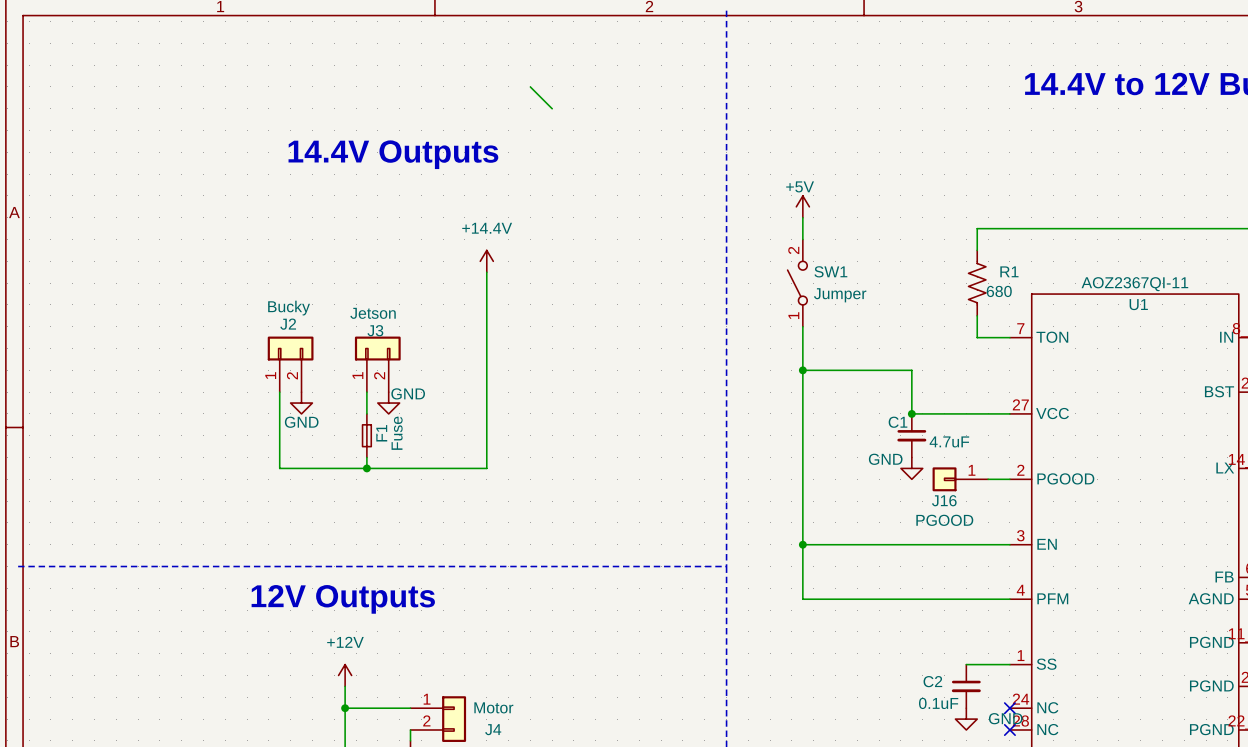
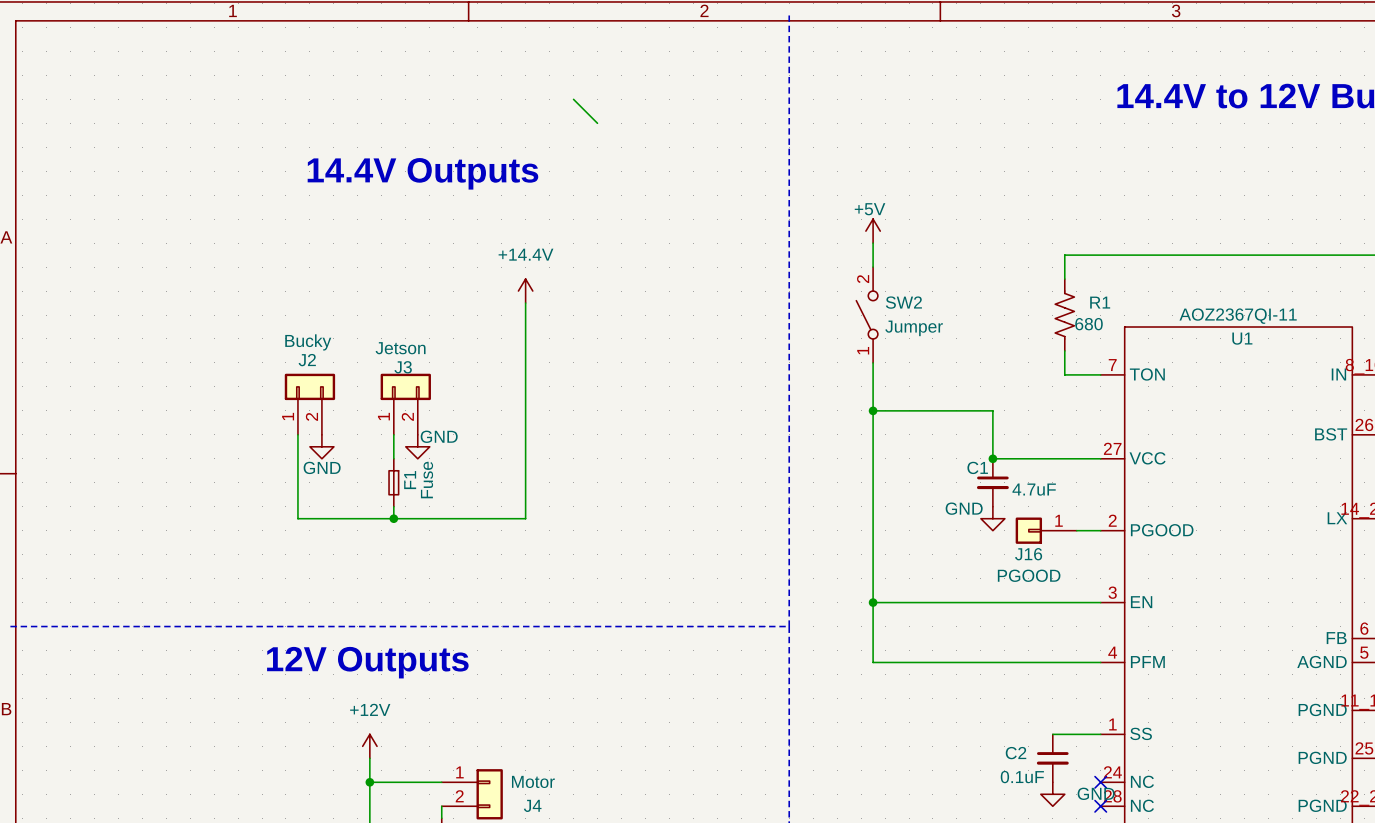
SW1 name: SW1 (830, 271) -> SW2 (903, 302)

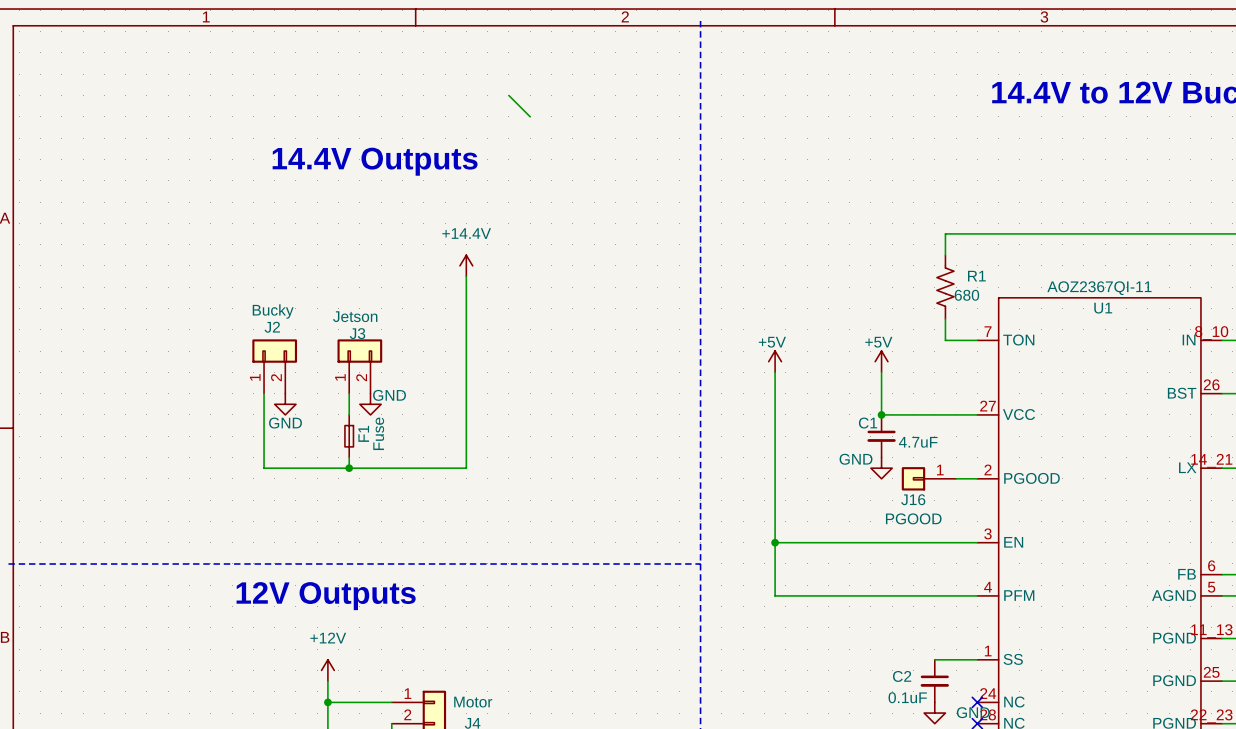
power symbol: +5V (873, 231) -> none
wire: (873, 243) (873, 267) -> none
SW2: Jumper (867, 315) -> none
wire: (873, 362) (873, 410) (992, 410) -> none
power symbol: none -> +5V (775, 361)
power symbol: none -> +5V (881, 361)
junction: (873, 410) -> none

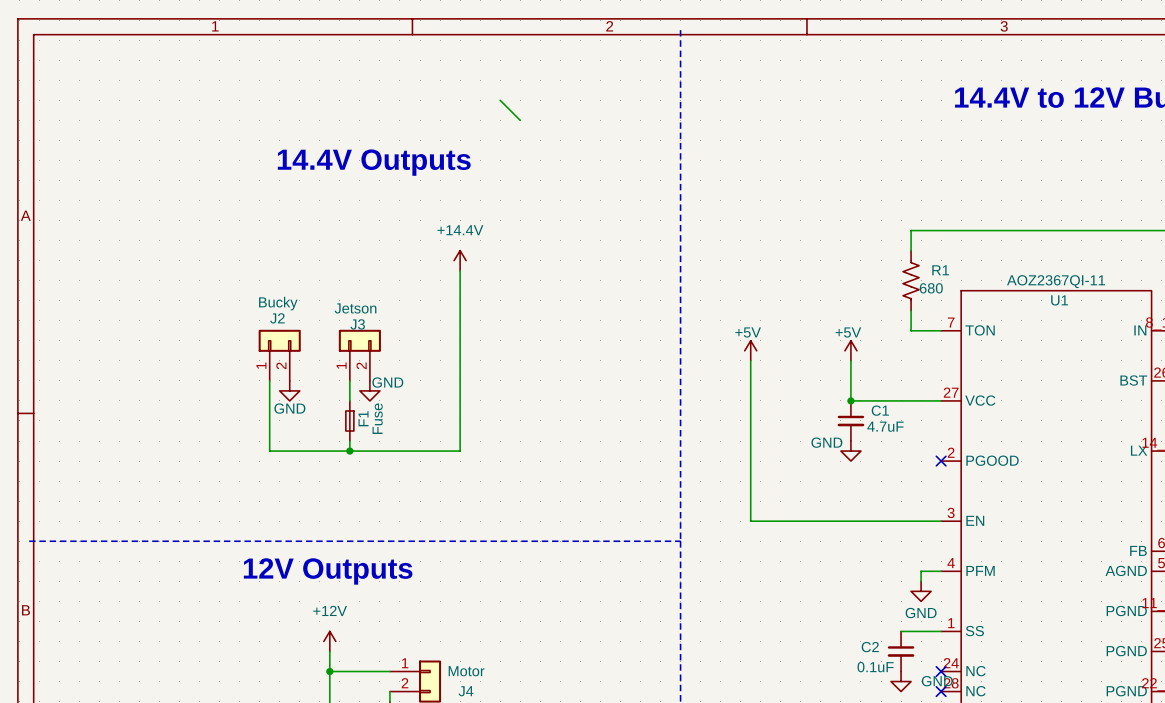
C1 name position: C1 (868, 423) -> C1 (880, 410)
J16: PGOOD (928, 478) -> none
wire: (956, 478) (977, 478) -> none
no-connect mark: none -> (941, 461)
wire: (775, 542) (775, 595) (956, 595) -> (921, 581) (921, 571)
junction: (775, 542) -> none
power symbol: none -> GND (921, 591)

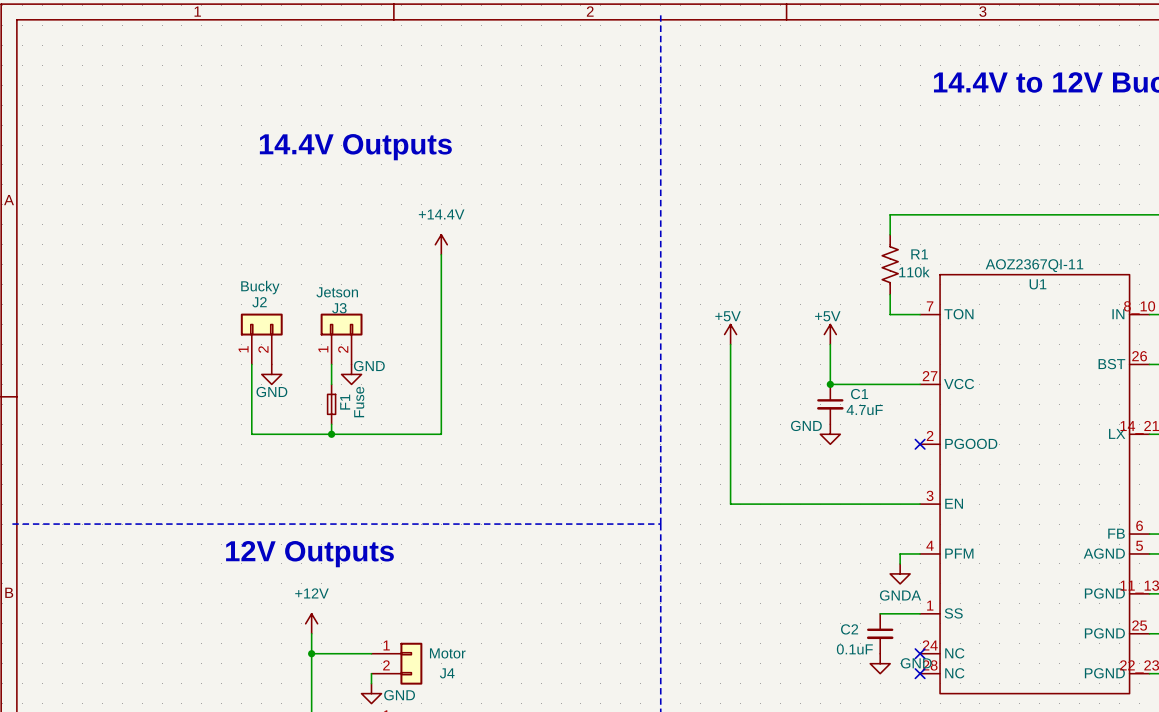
wire: (500, 100) (520, 120) -> none
R1 value: 680 (931, 288) -> 110k (914, 272)
power symbol: GND (921, 591) -> GNDA (900, 573)

